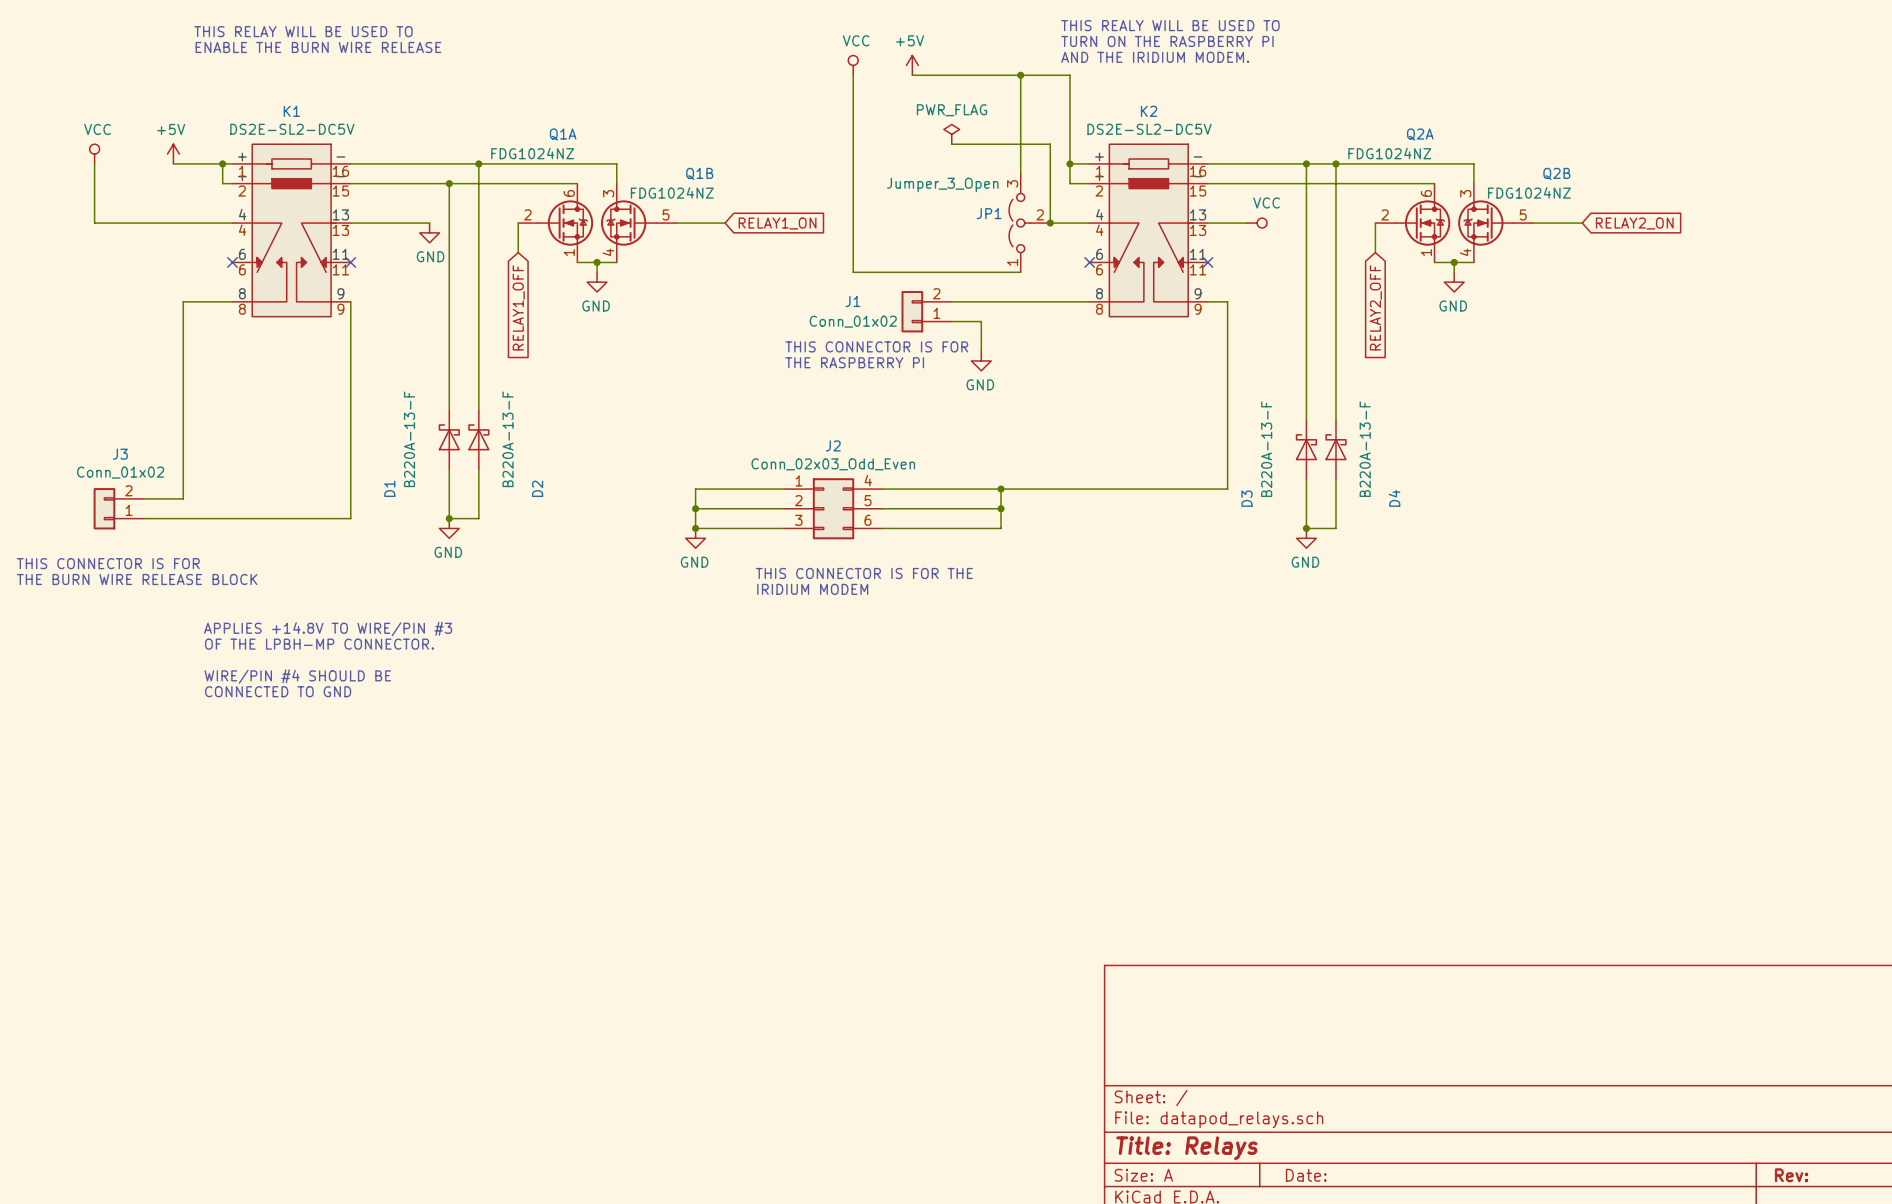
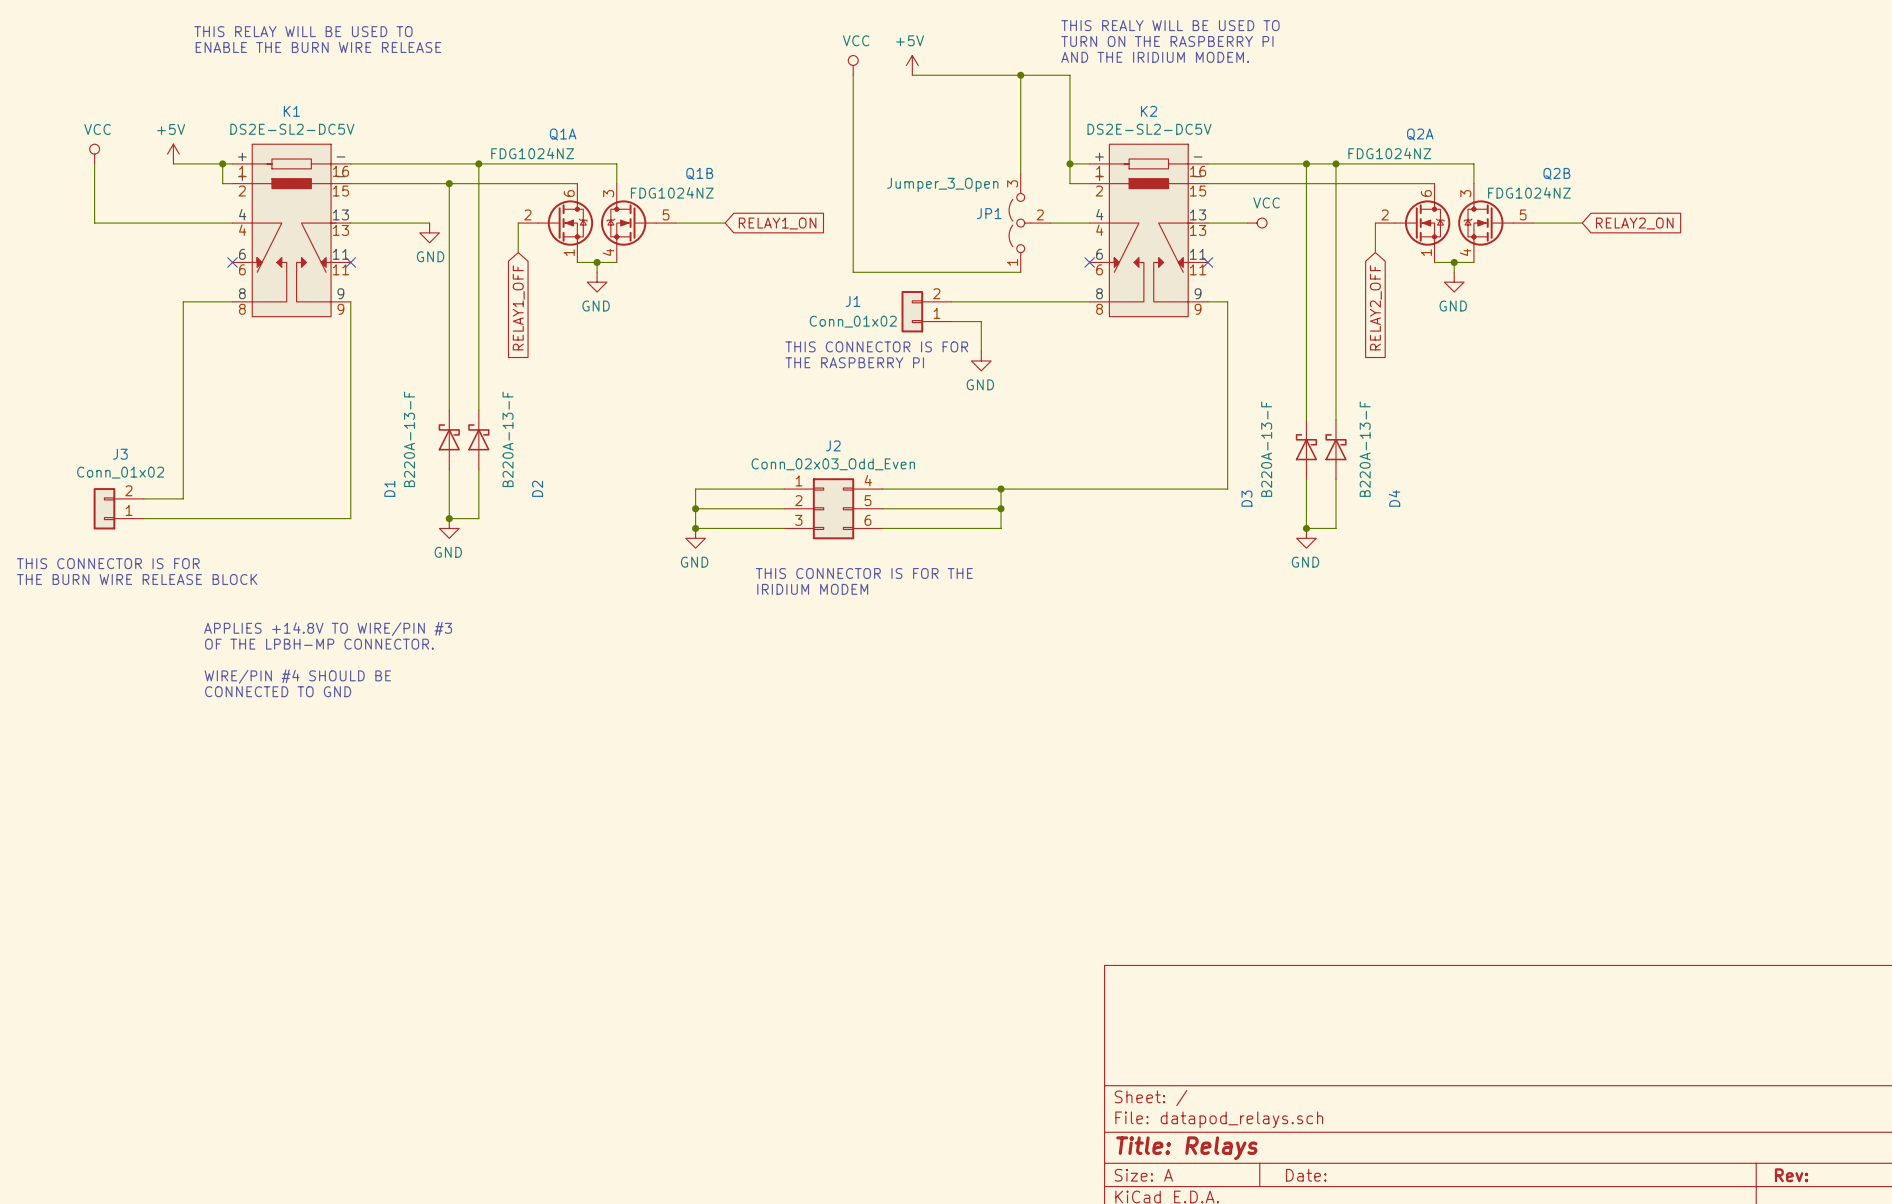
power symbol: PWR_FLAG (951, 134) -> none
wire: (951, 144) (1050, 144) (1050, 223) -> none
junction: (1050, 223) -> none

